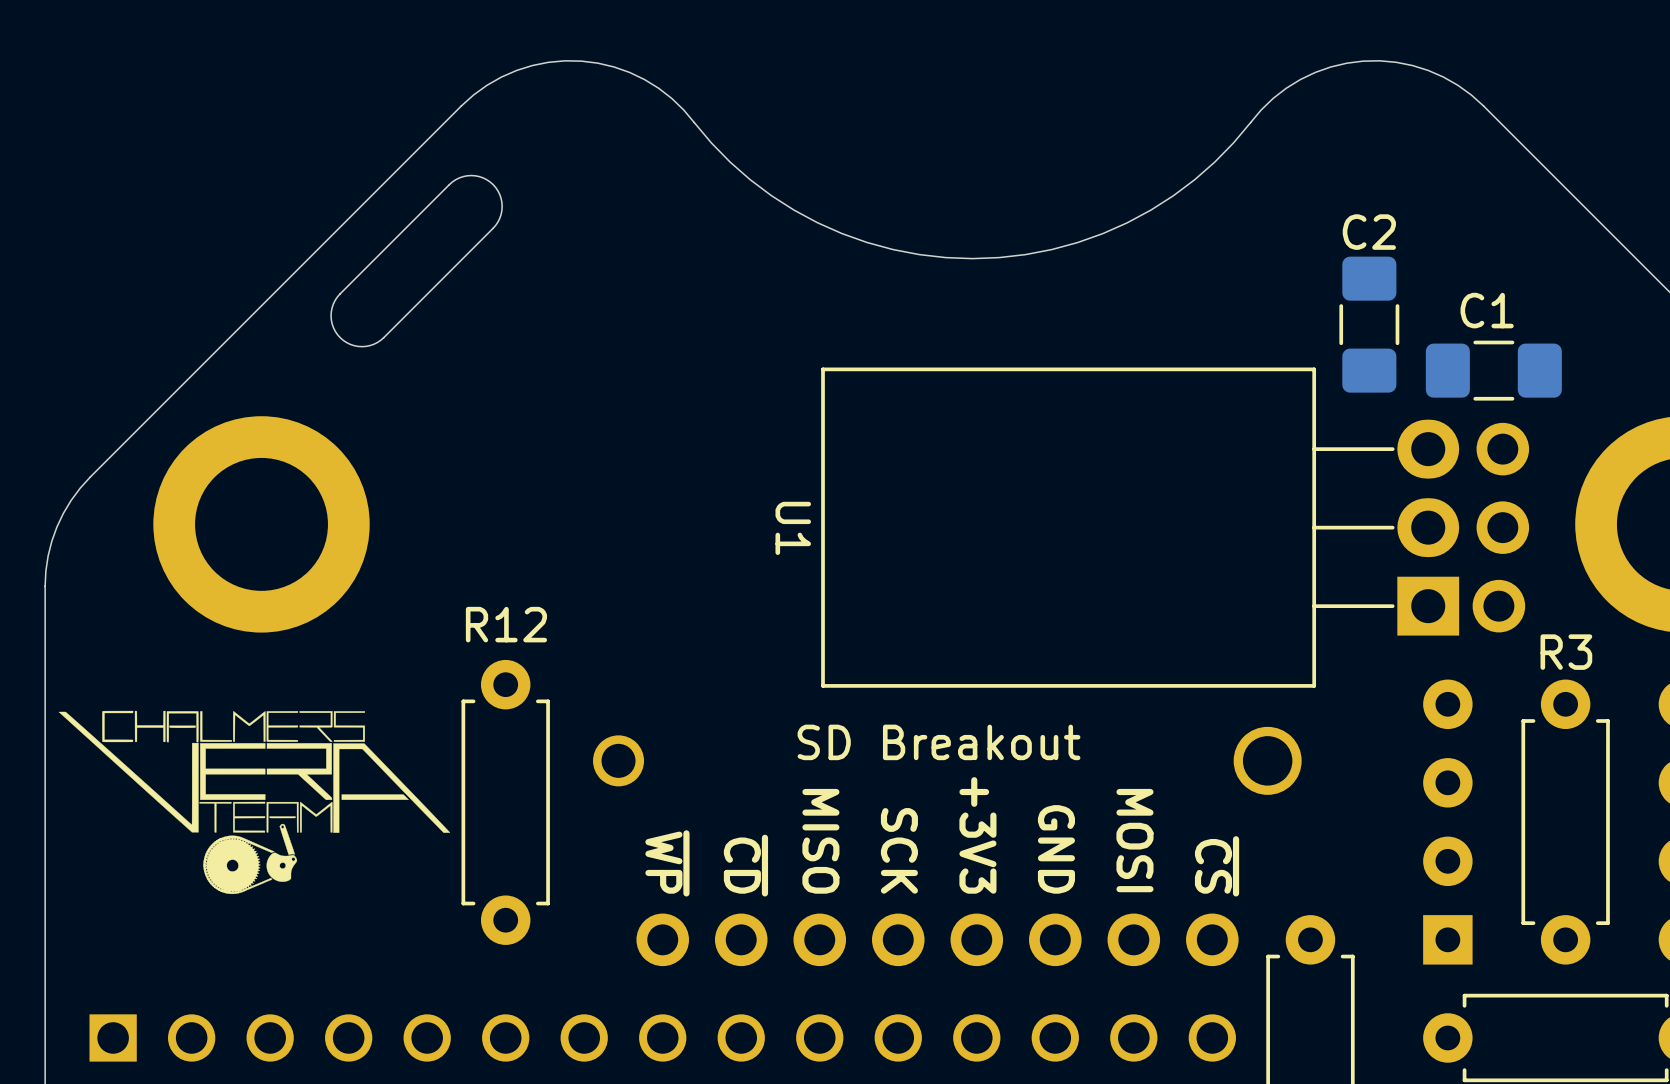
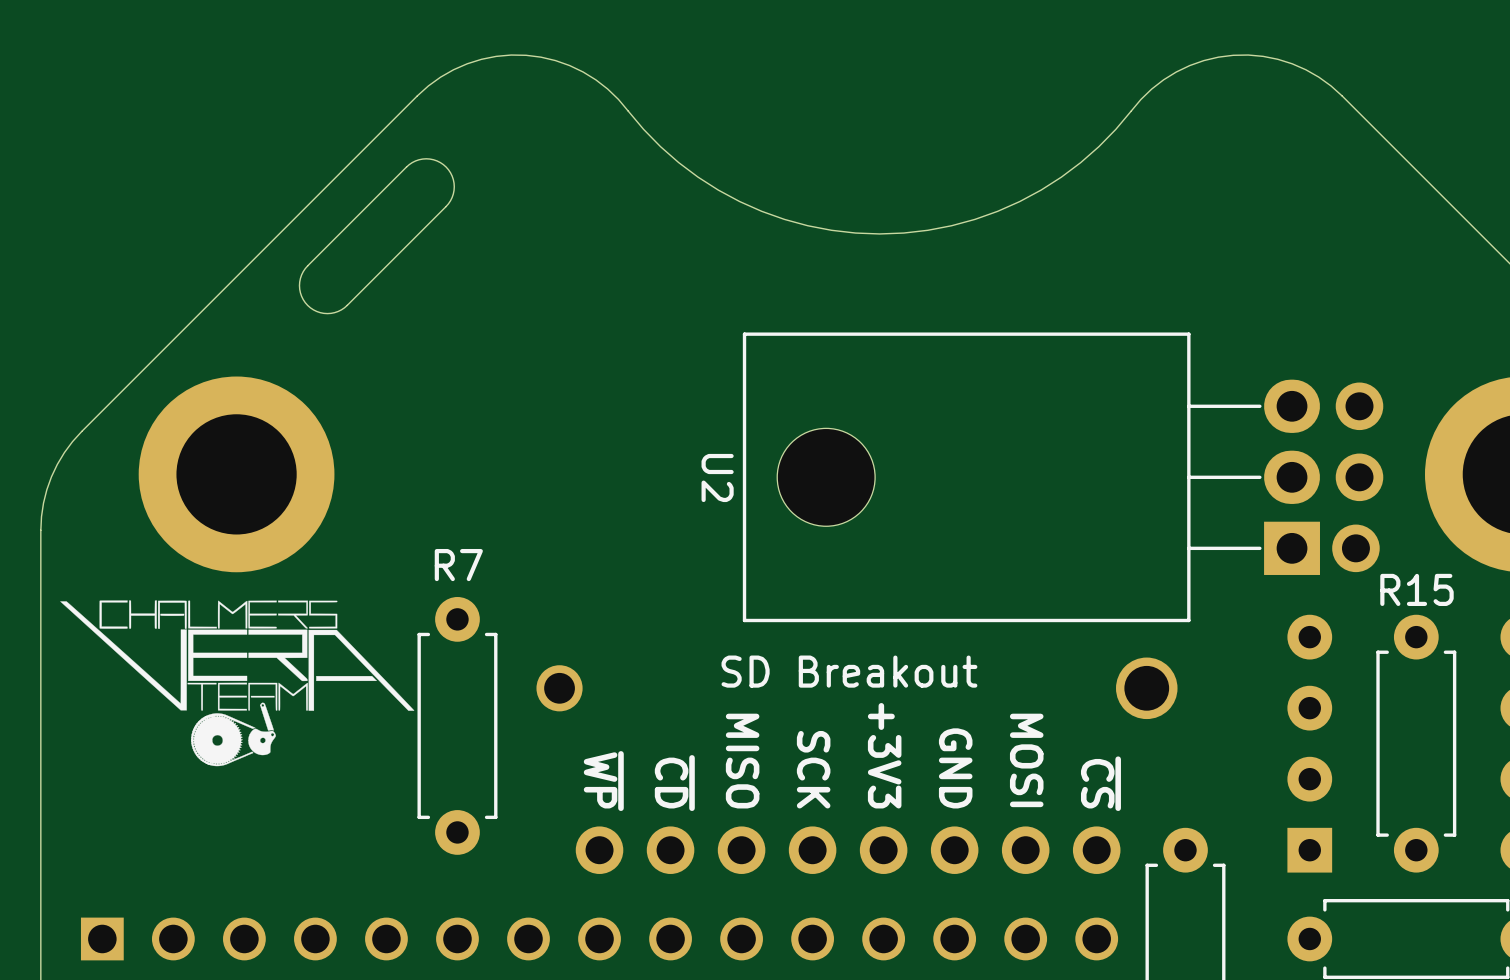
C2: (1369, 324) -> none
C1: (1493, 370) -> none
U1: (1140, 527) -> none
U2: none -> (1031, 477)
R12 name: R12 (506, 624) -> R7 (458, 565)
R3 name: R3 (1566, 652) -> R15 (1416, 589)
drawing position: (254, 802) -> (237, 683)

